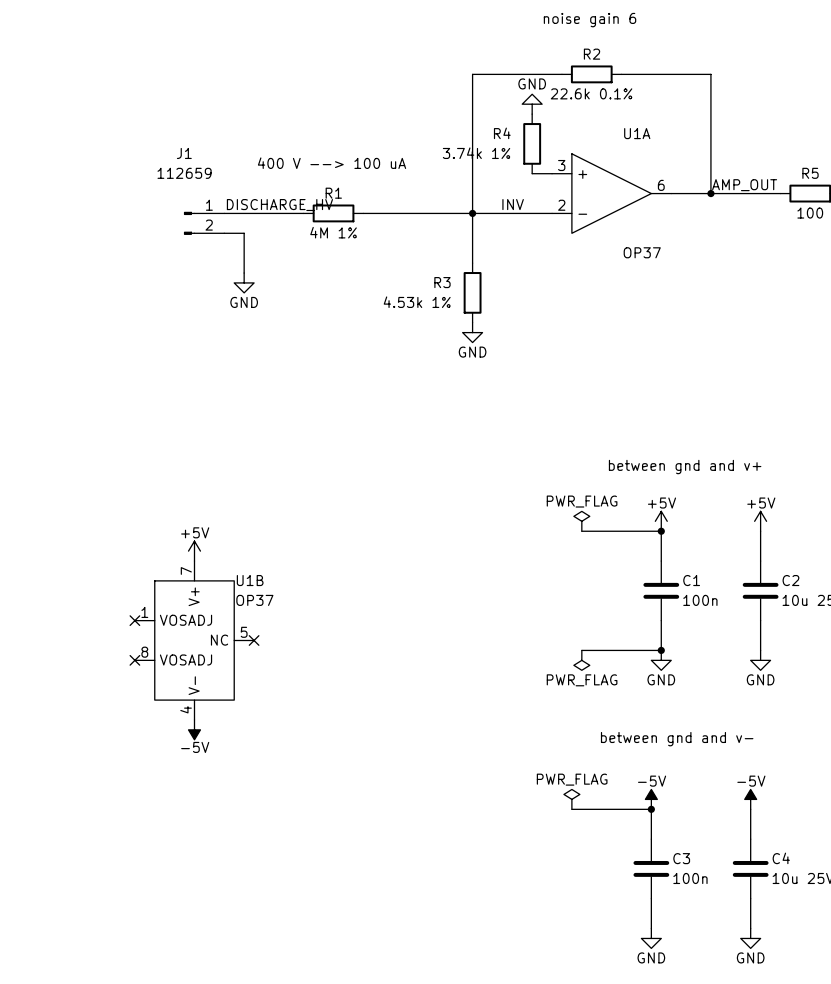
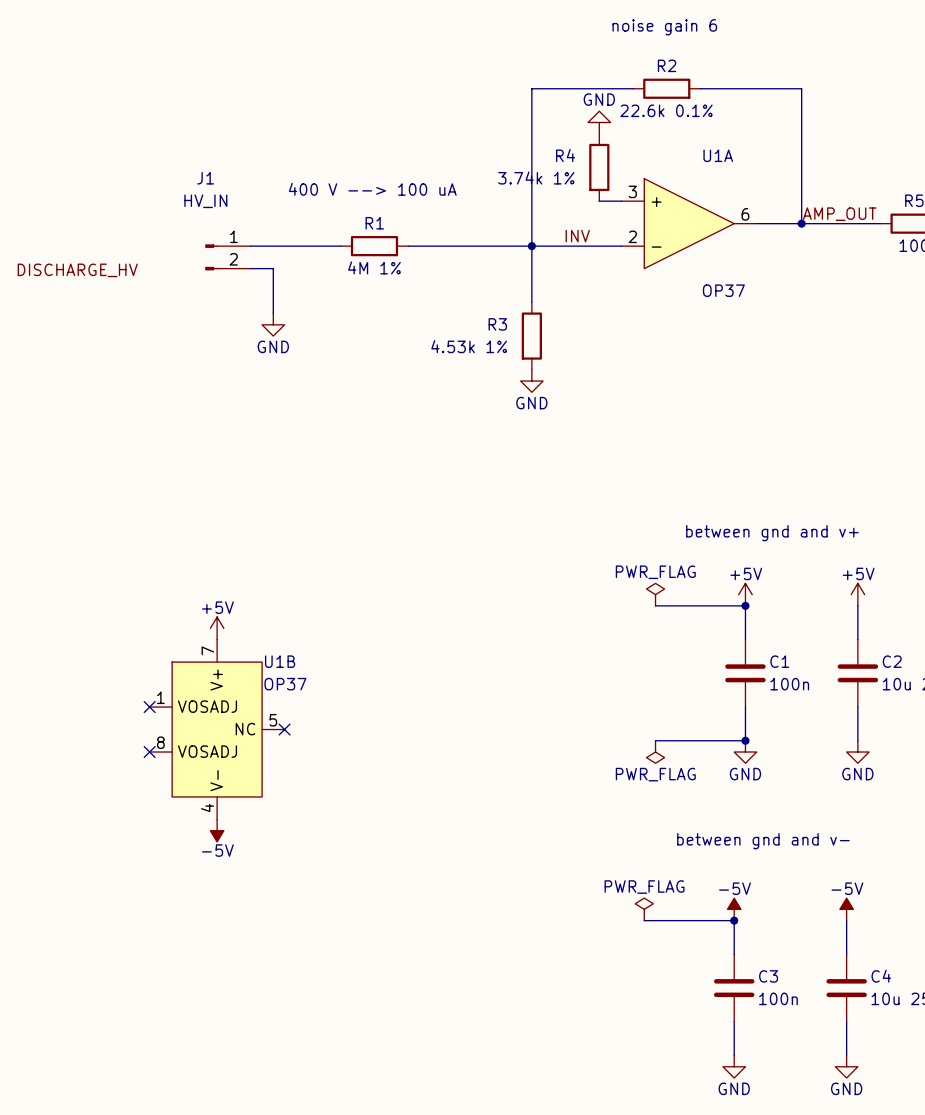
J1 value: 112659 (184, 173) -> HV_IN (205, 201)
label: DISCHARGE_HV (279, 205) -> none
label: none -> DISCHARGE_HV (77, 270)

